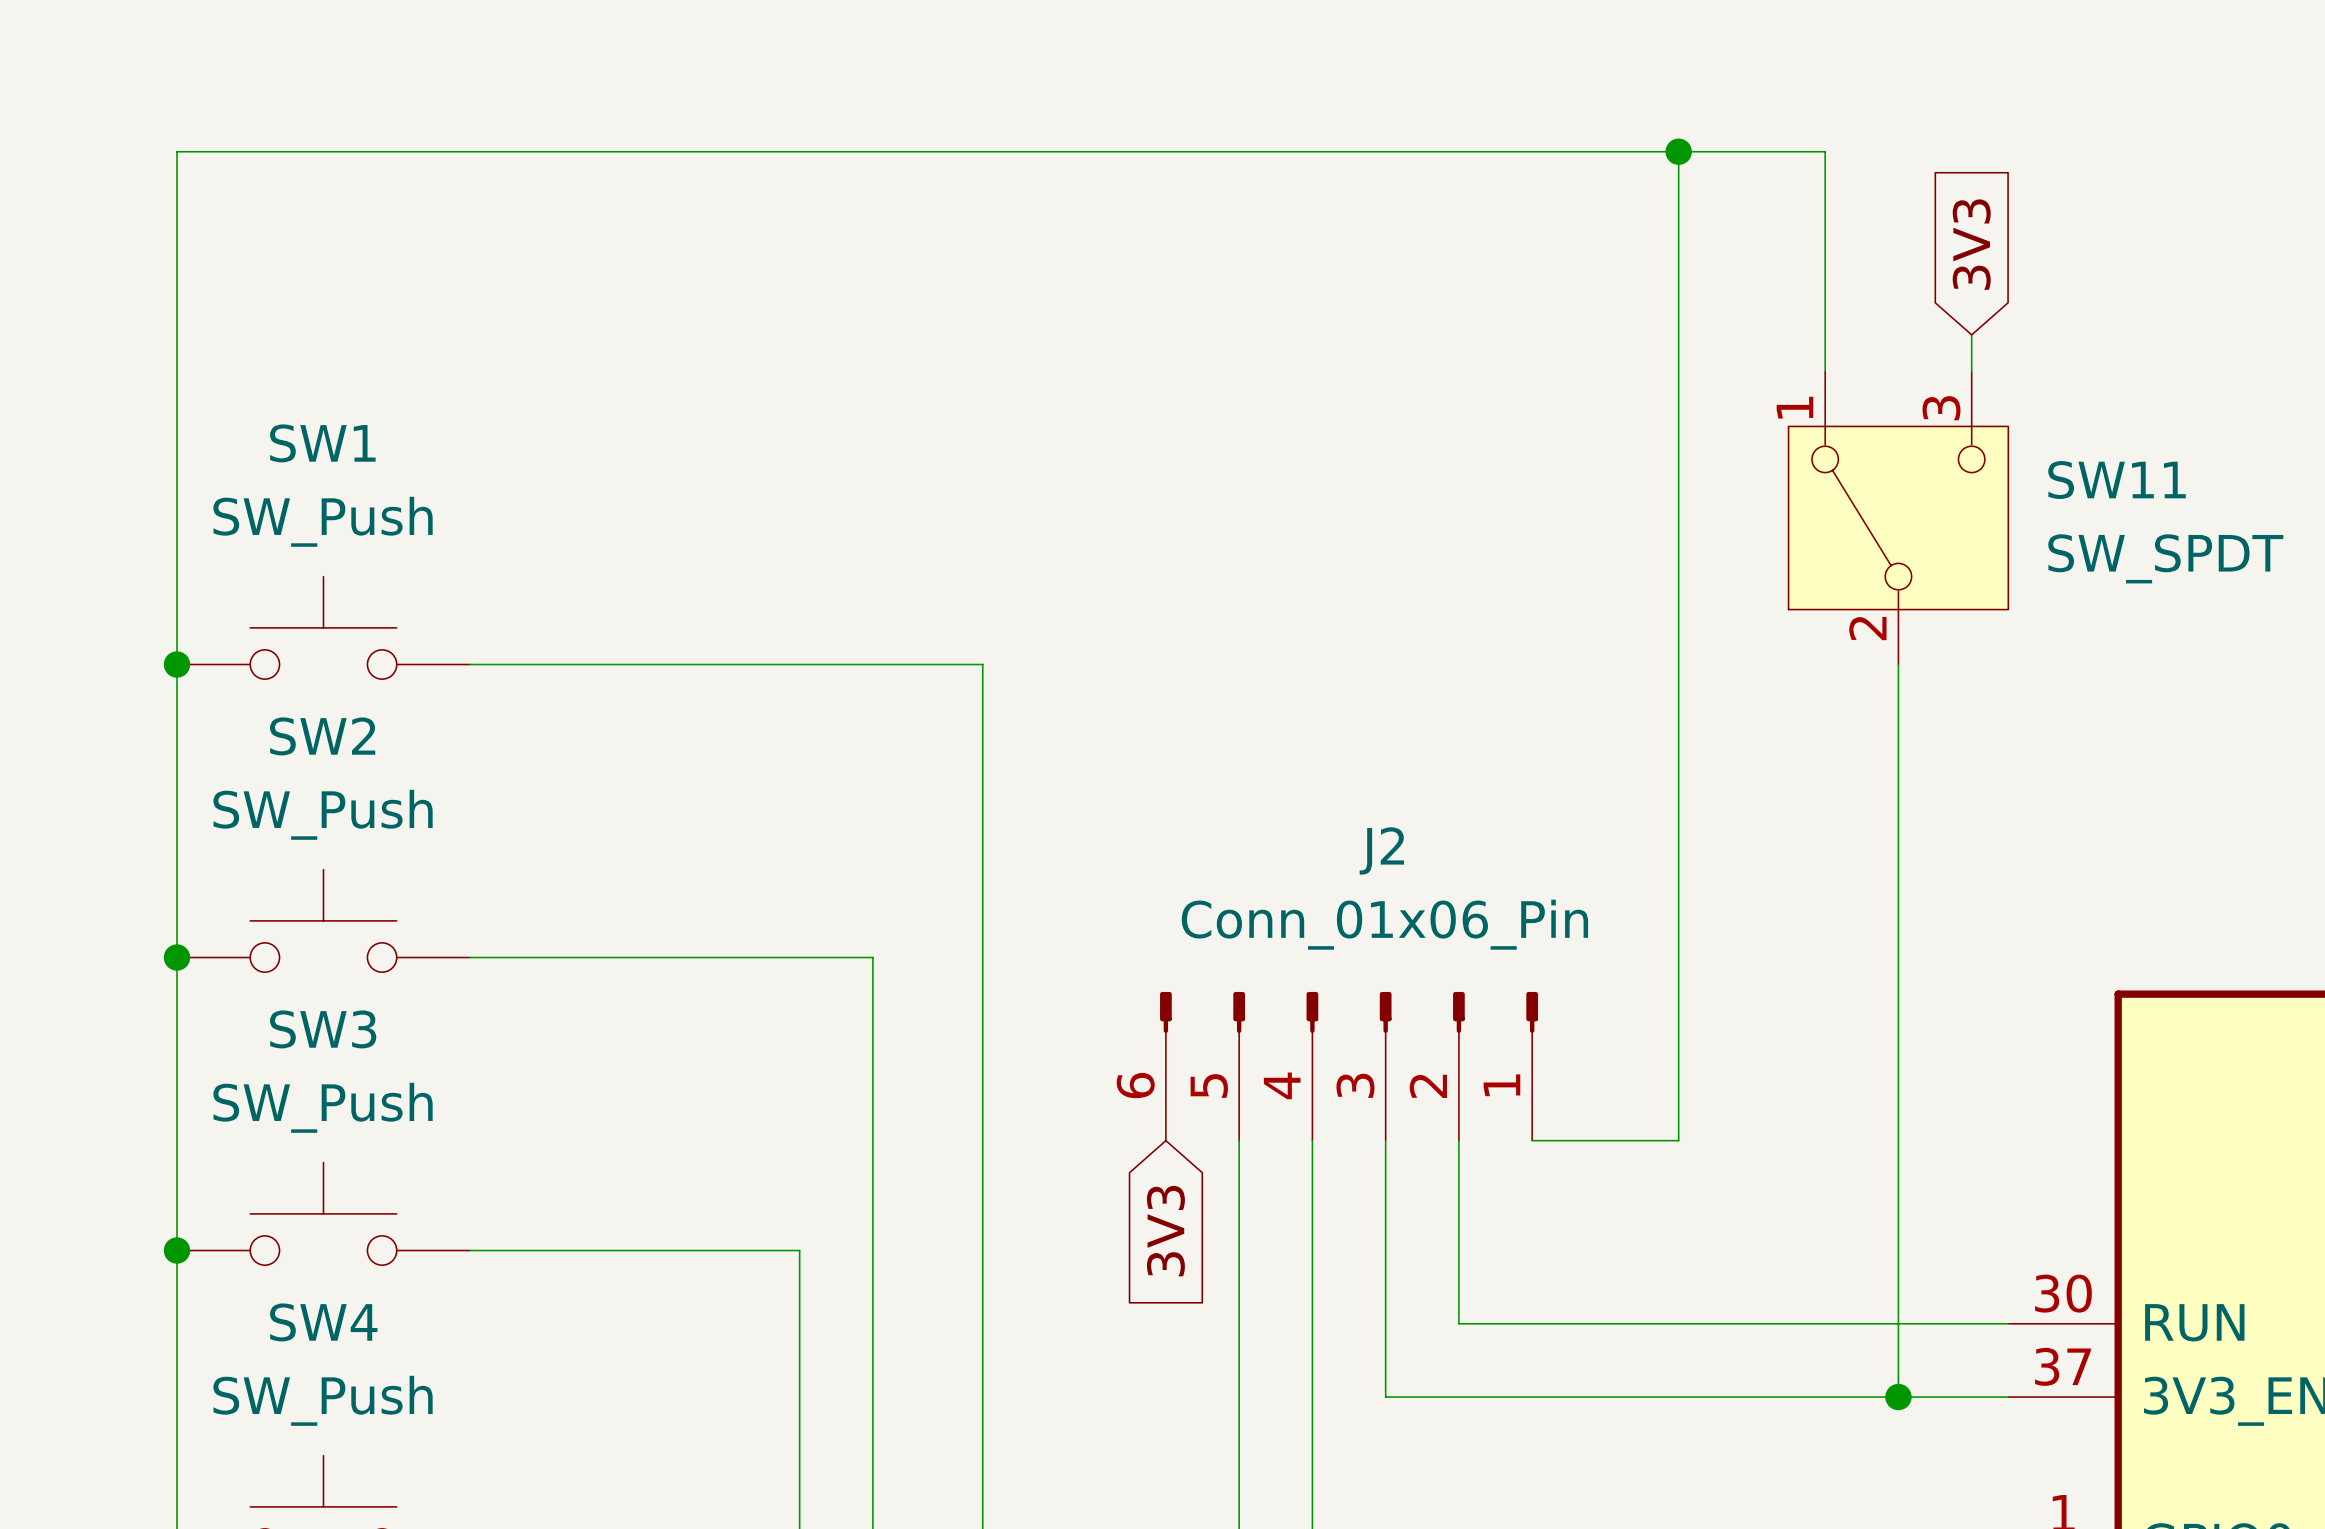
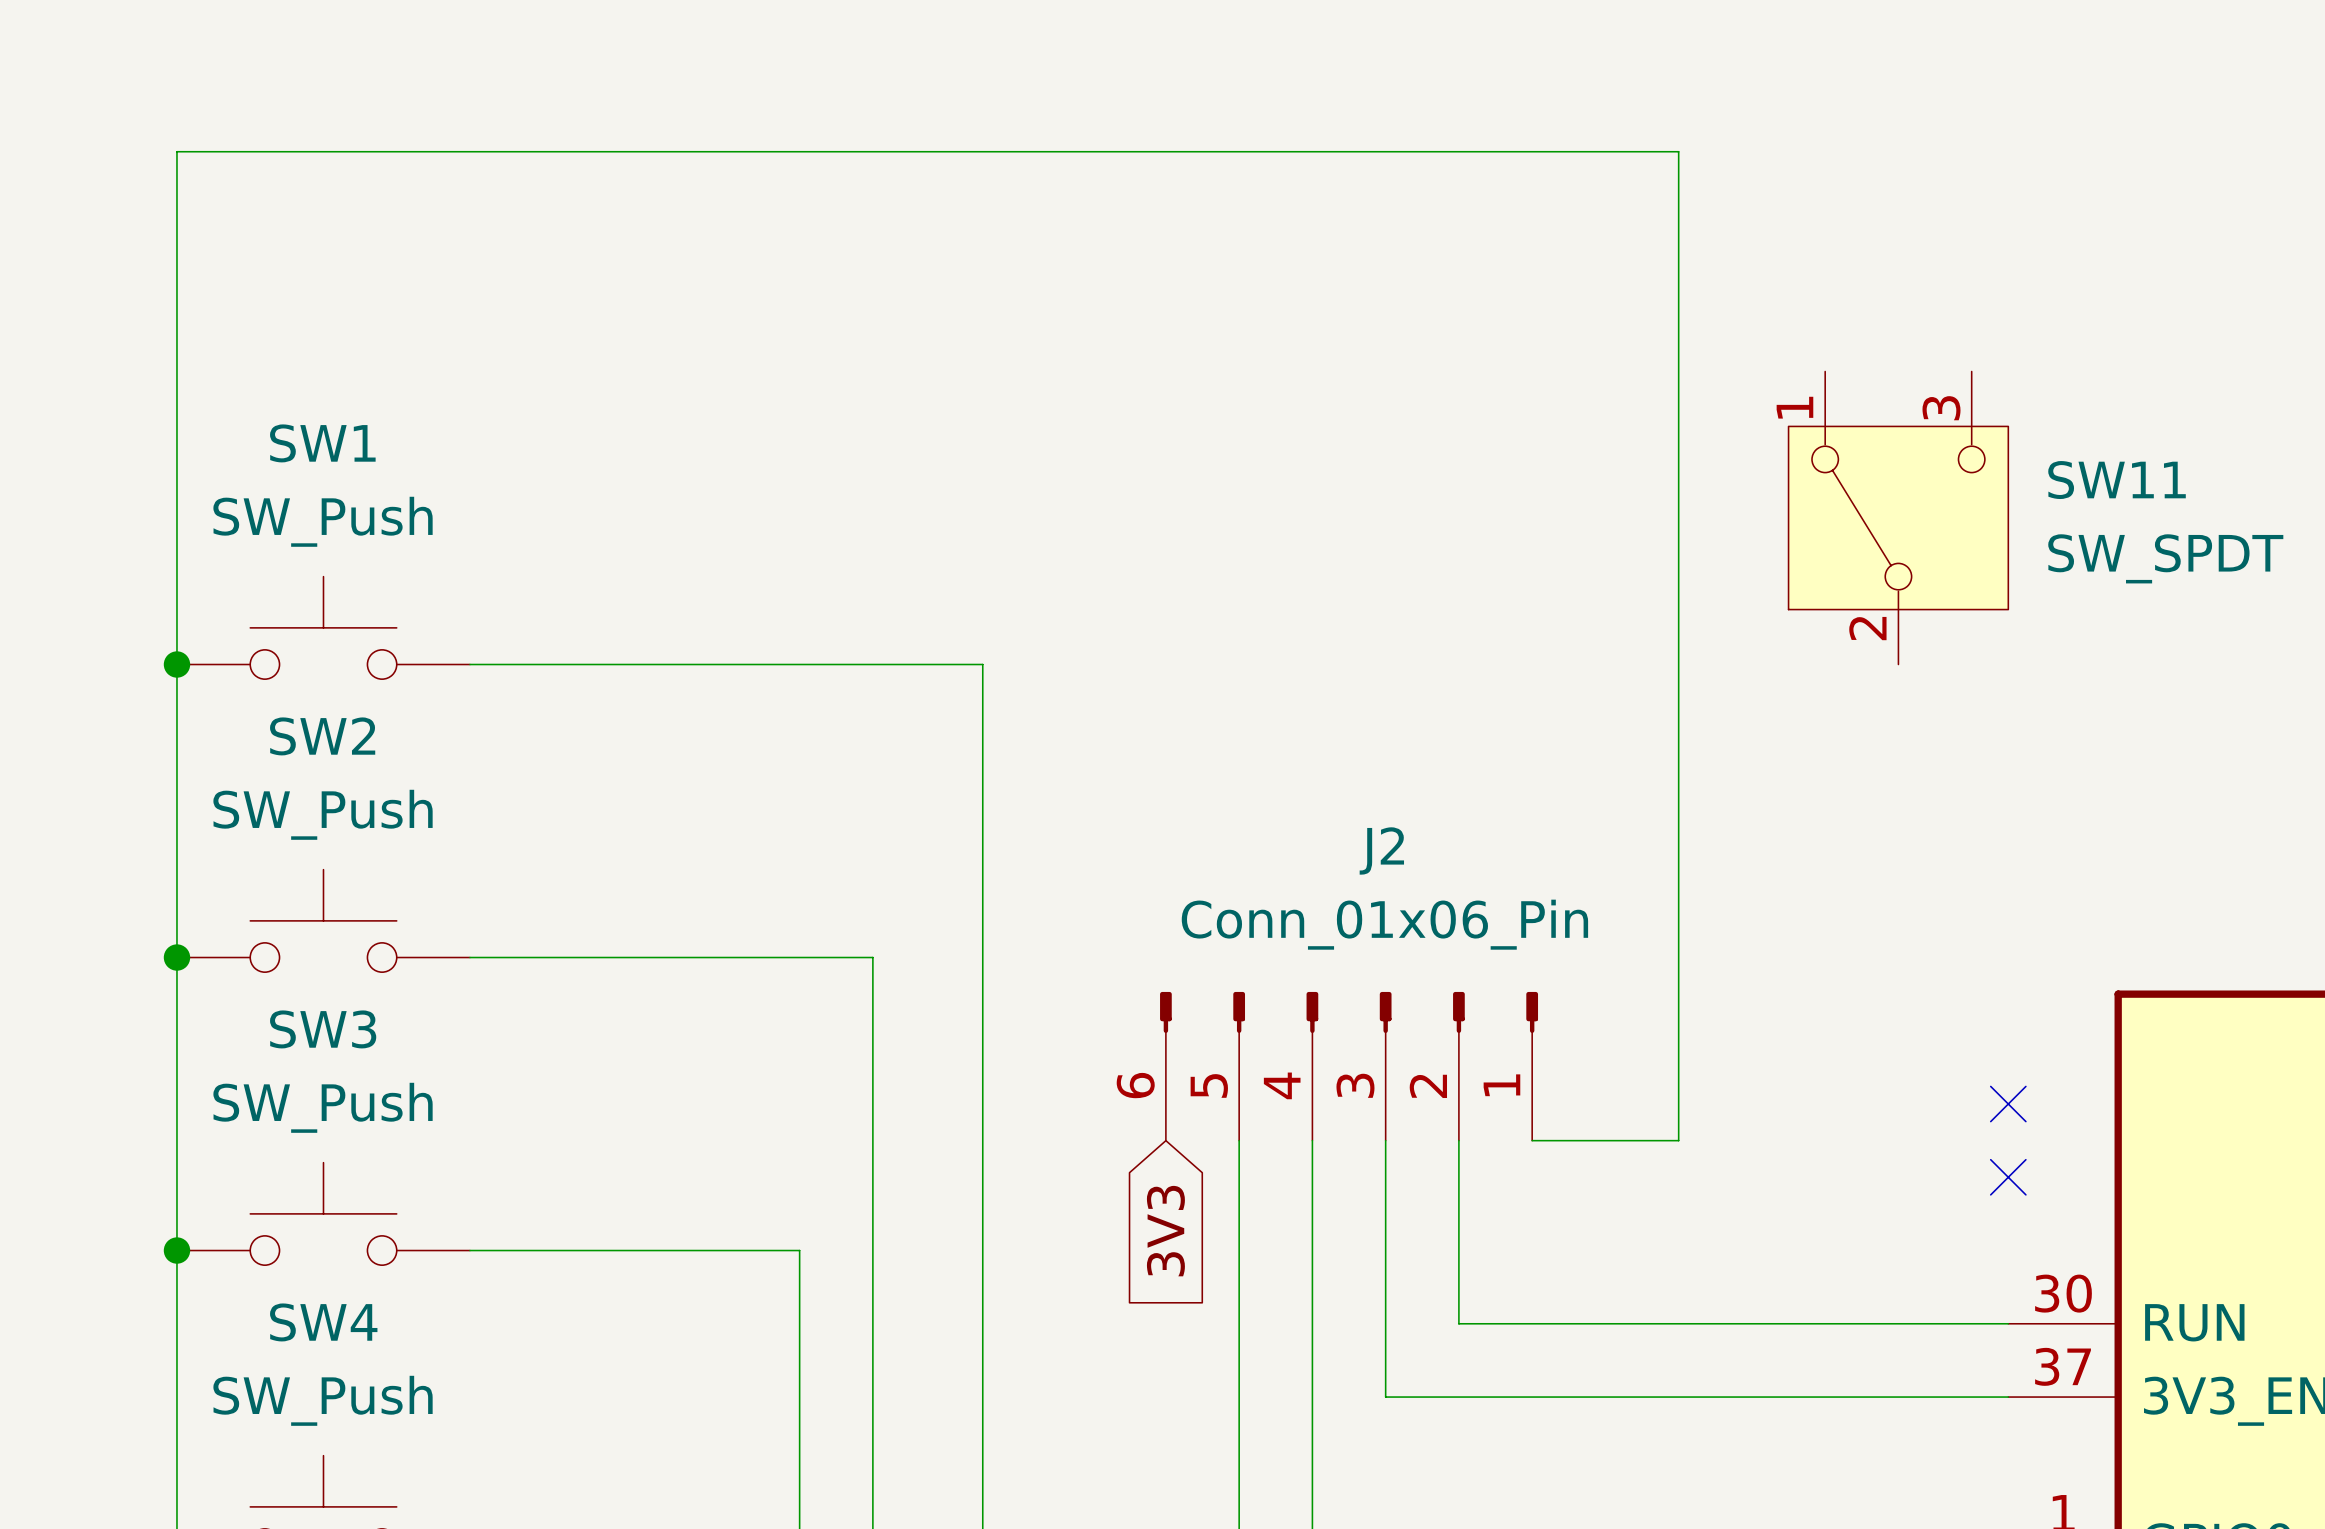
wire: (1678, 151) (1825, 151) (1825, 371) -> none
junction: (1678, 151) -> none
global label: 3V3 (1971, 244) -> none
wire: (1971, 334) (1971, 371) -> none
wire: (1898, 664) (1898, 1397) -> none
no-connect mark: none -> (2008, 1104)
no-connect mark: none -> (2008, 1177)
junction: (1898, 1397) -> none

